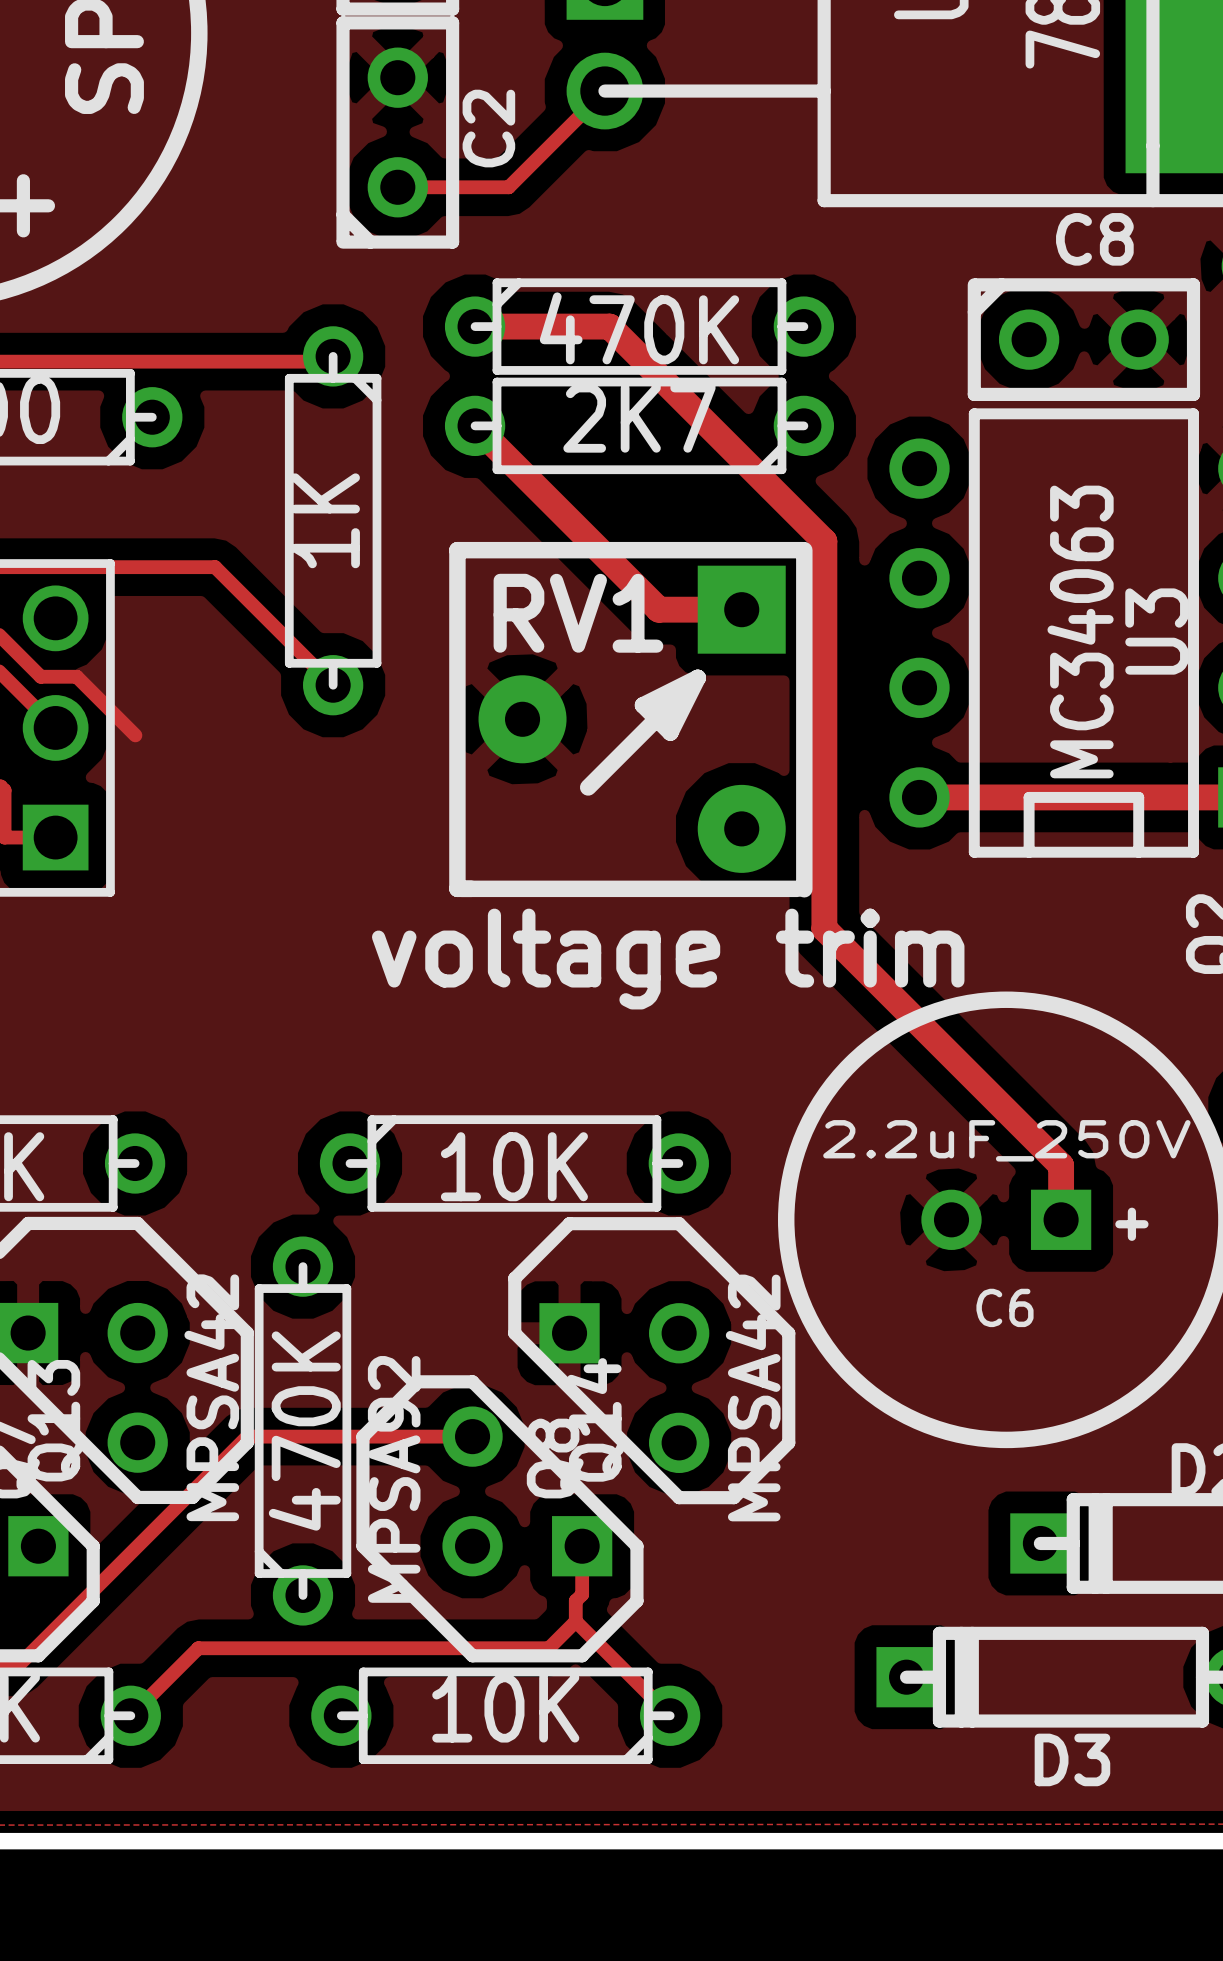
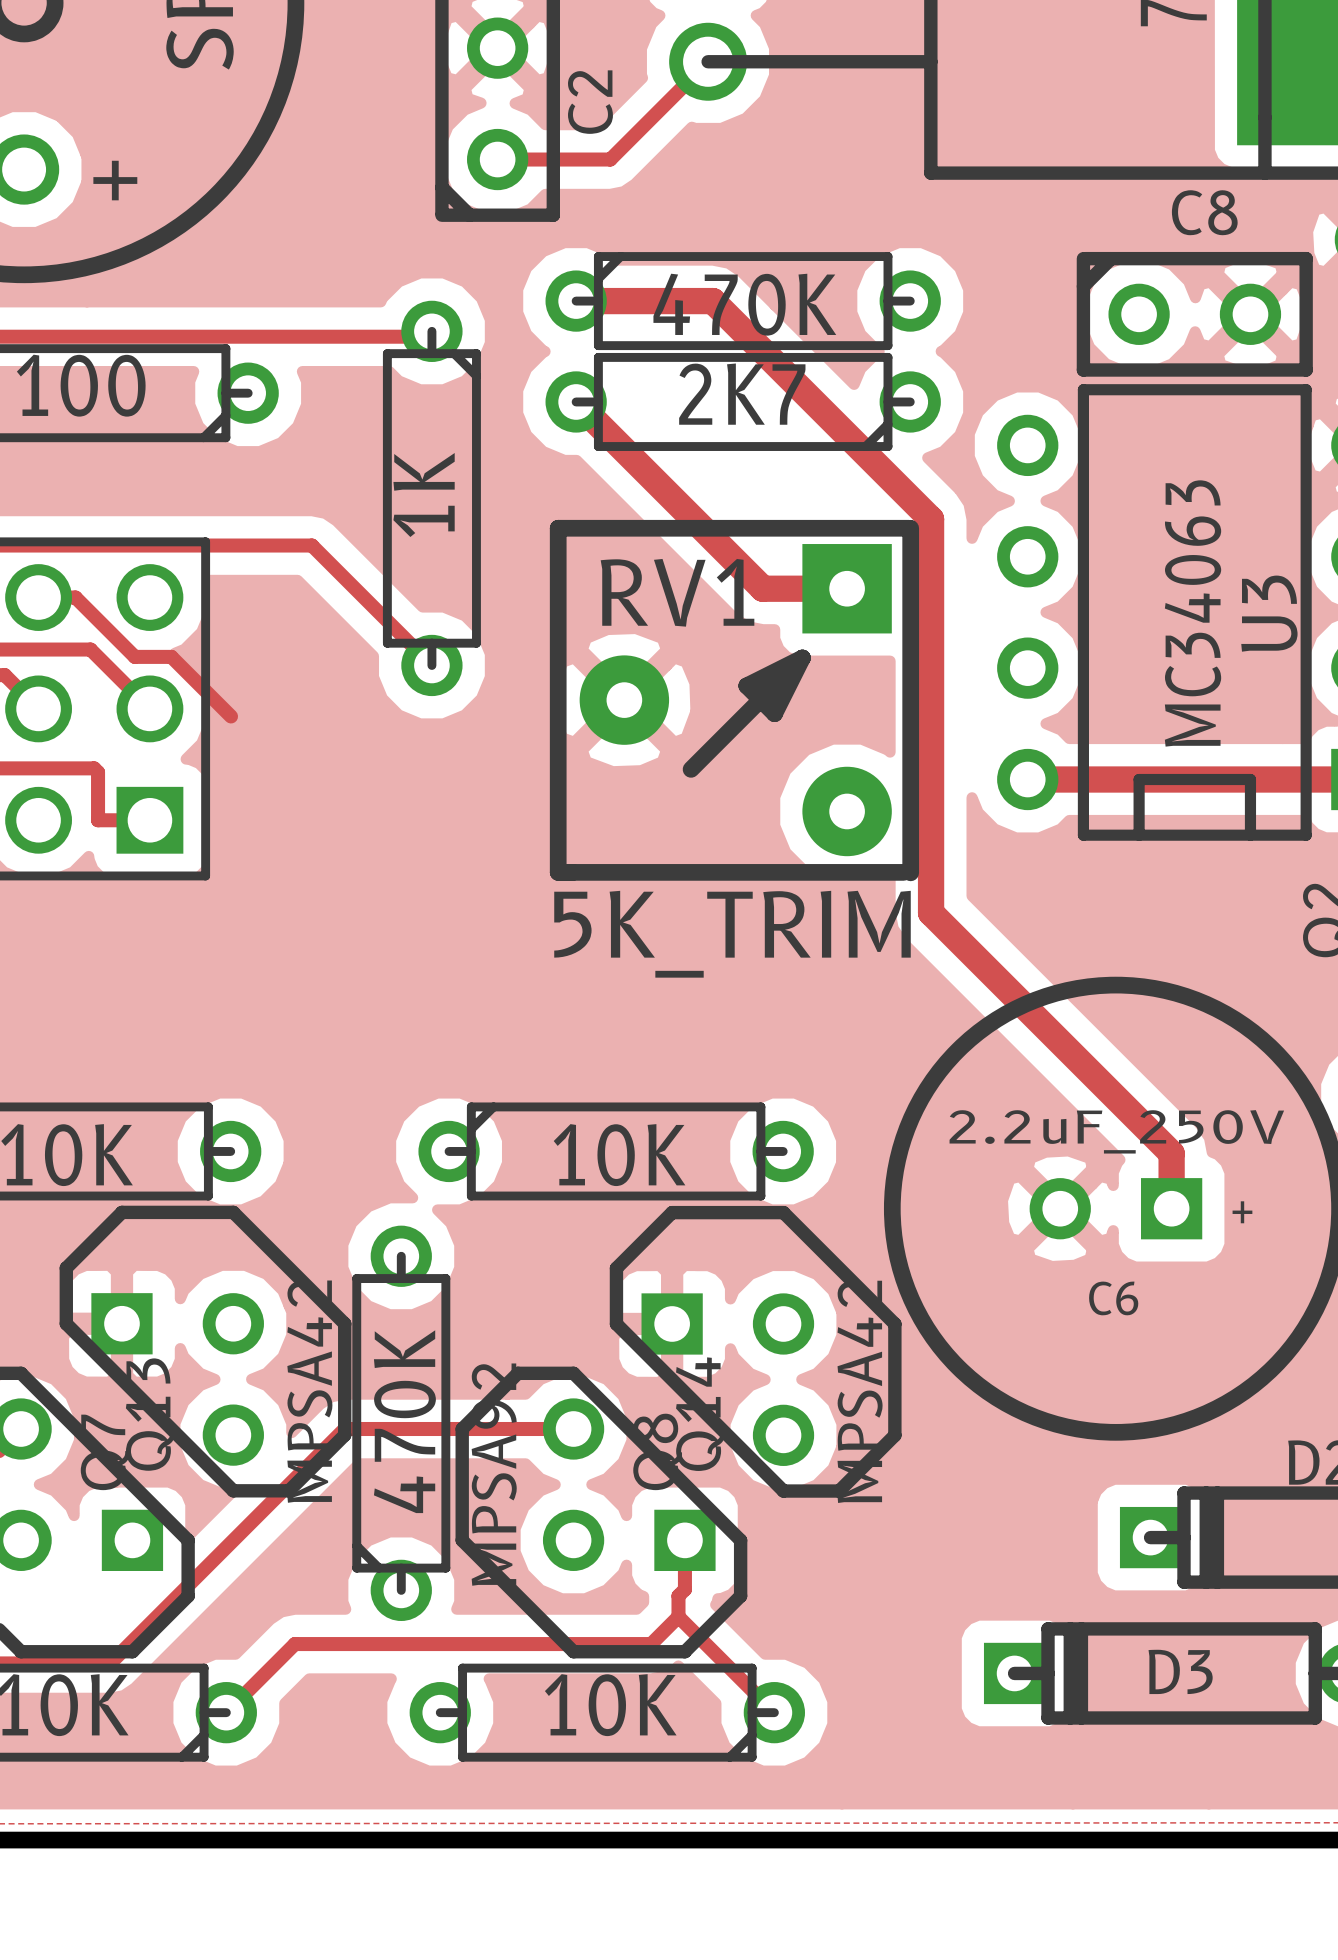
RV1 value: voltage trim (668, 959) -> 5K_TRIM (732, 934)
D3 name position: D3 (1072, 1759) -> D3 (1180, 1671)

